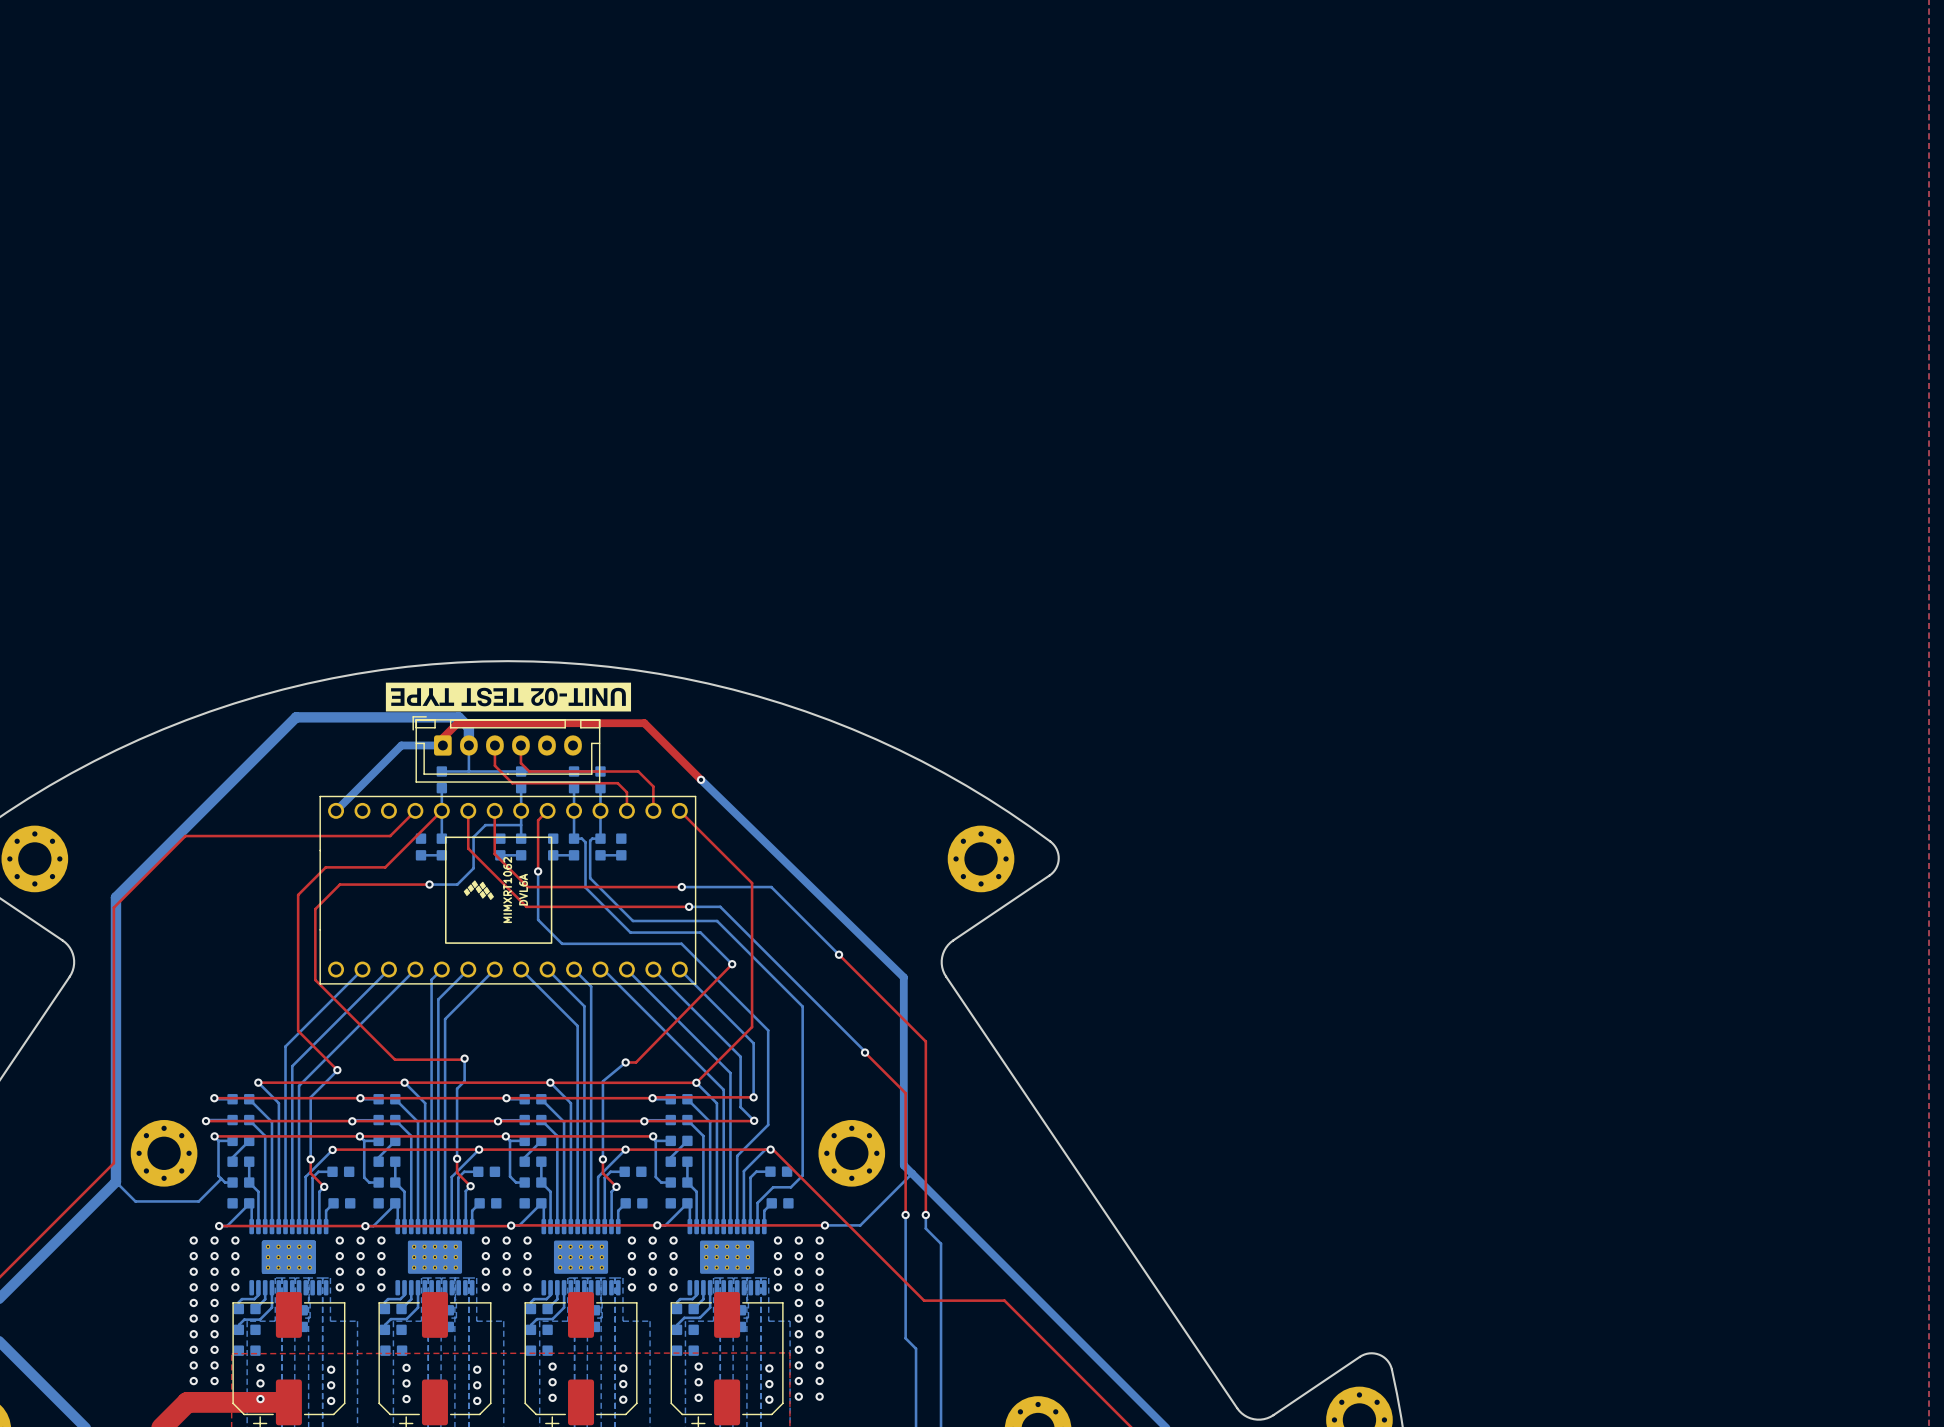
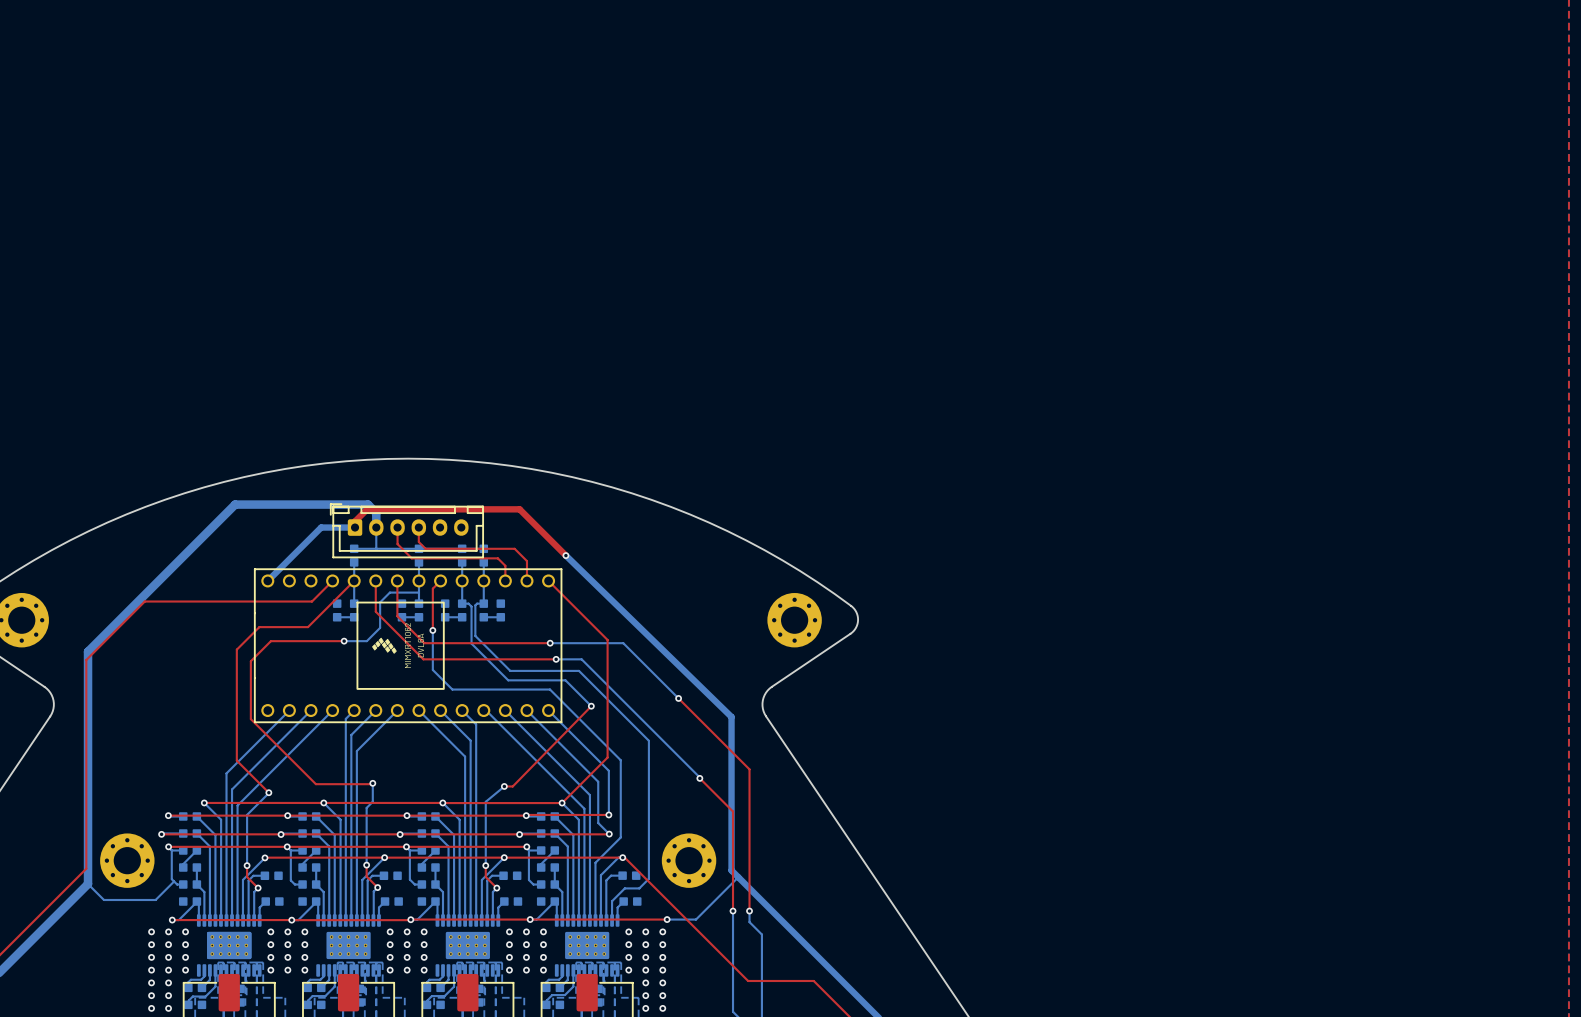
drawing: [385, 682, 632, 712] -> none

